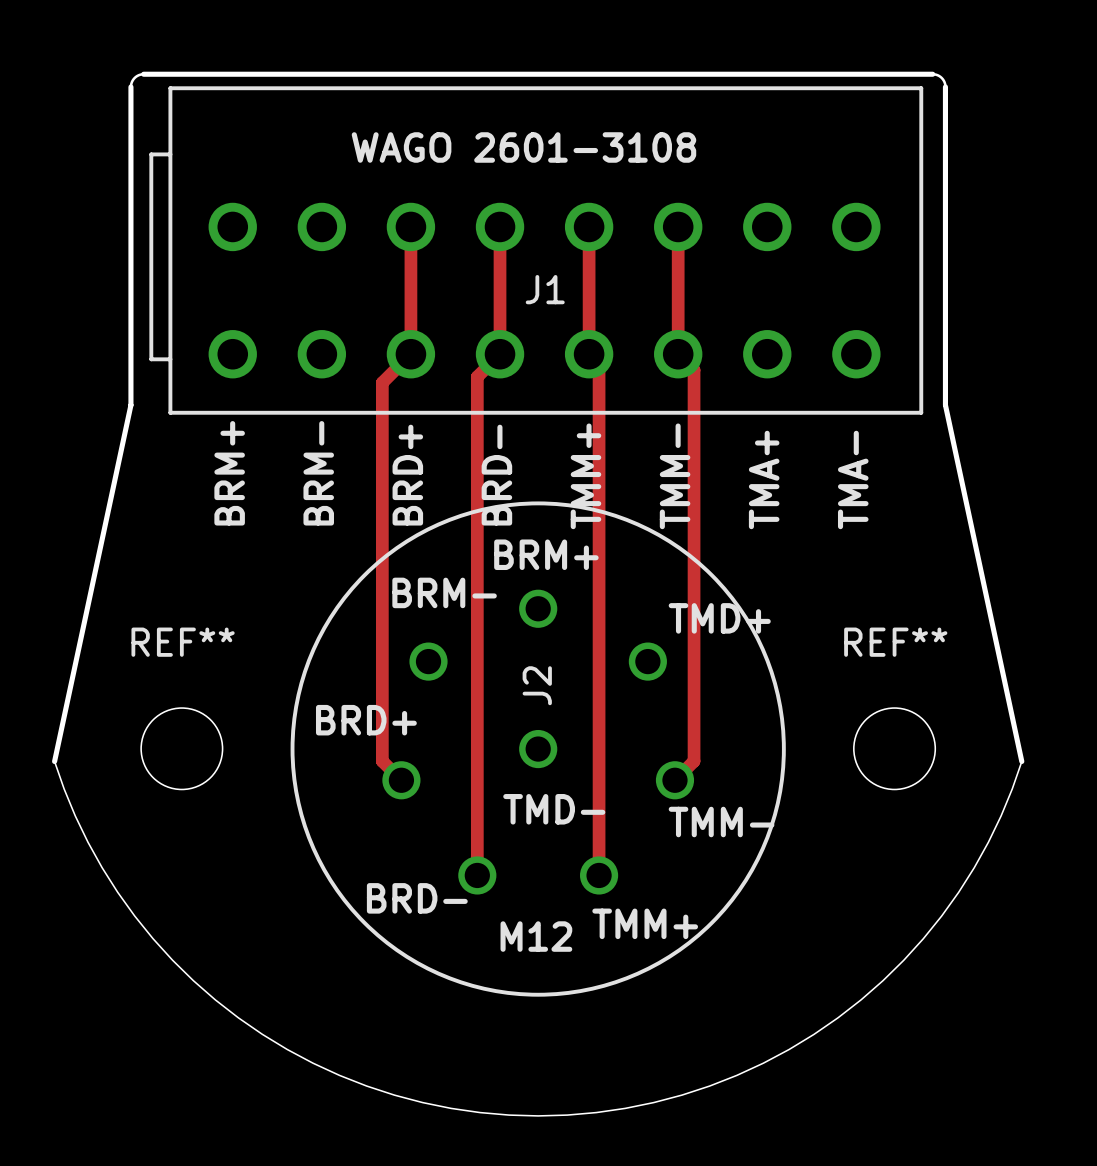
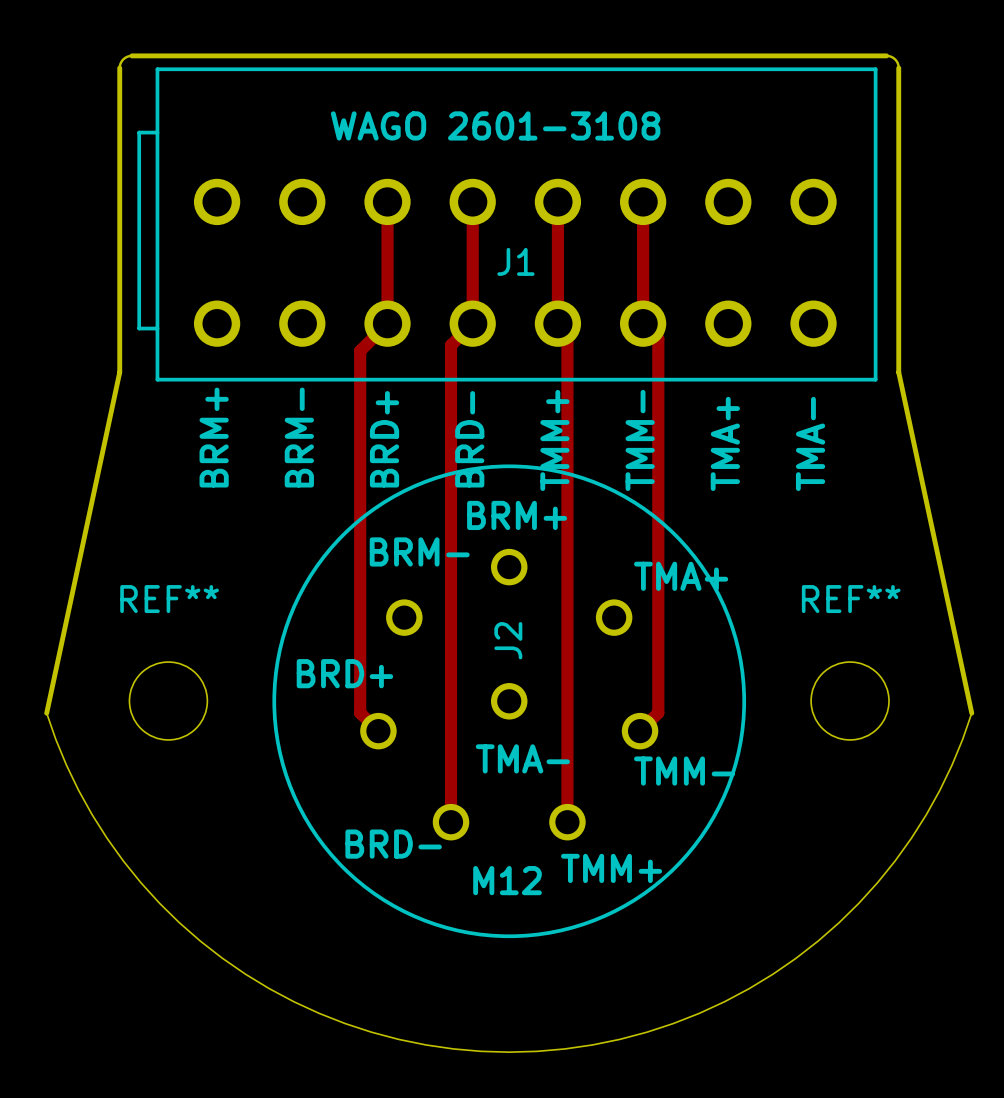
text: TMD+ (719, 618) -> TMA+ (681, 576)
text: TMD- (554, 809) -> TMA- (522, 758)

